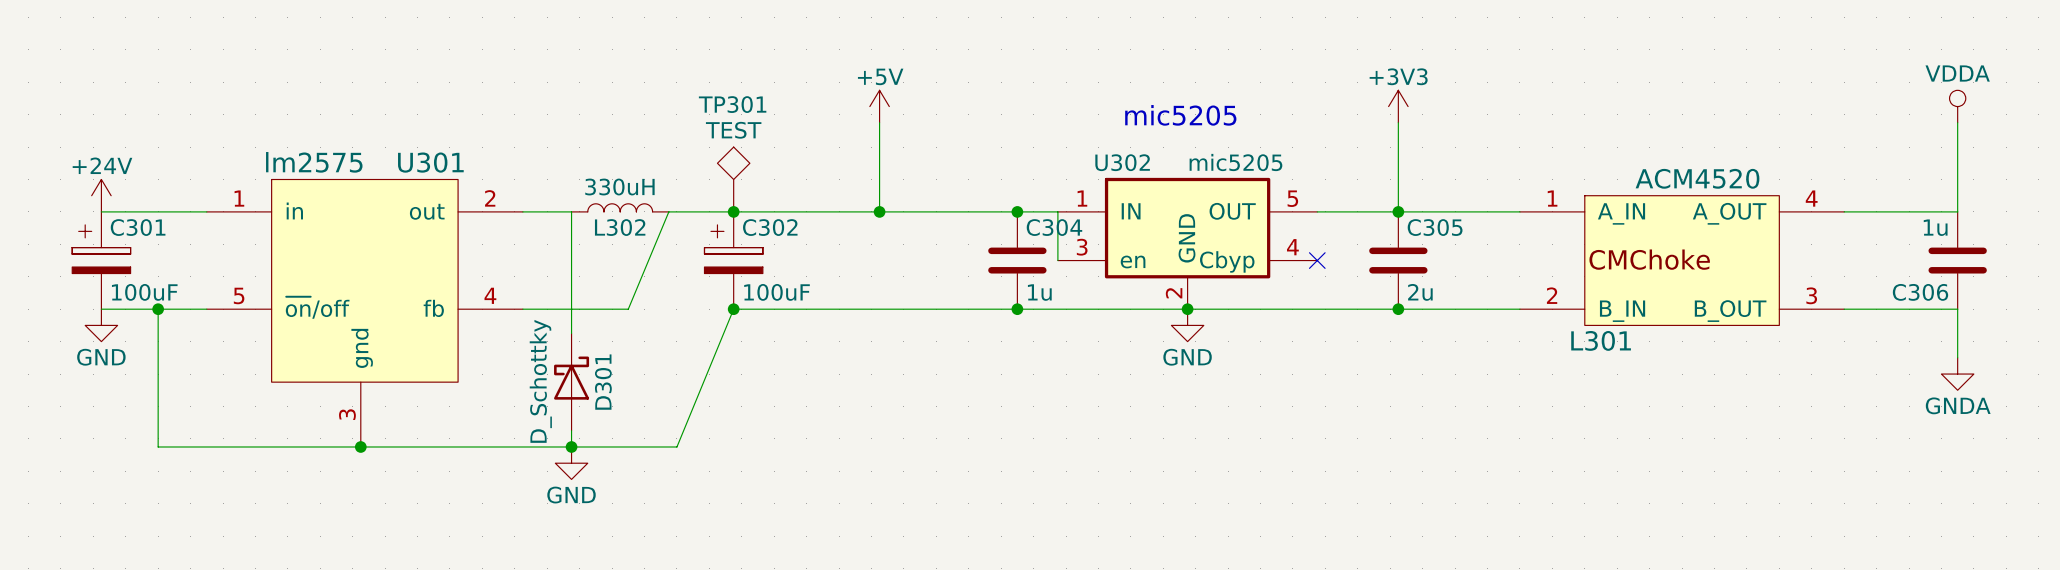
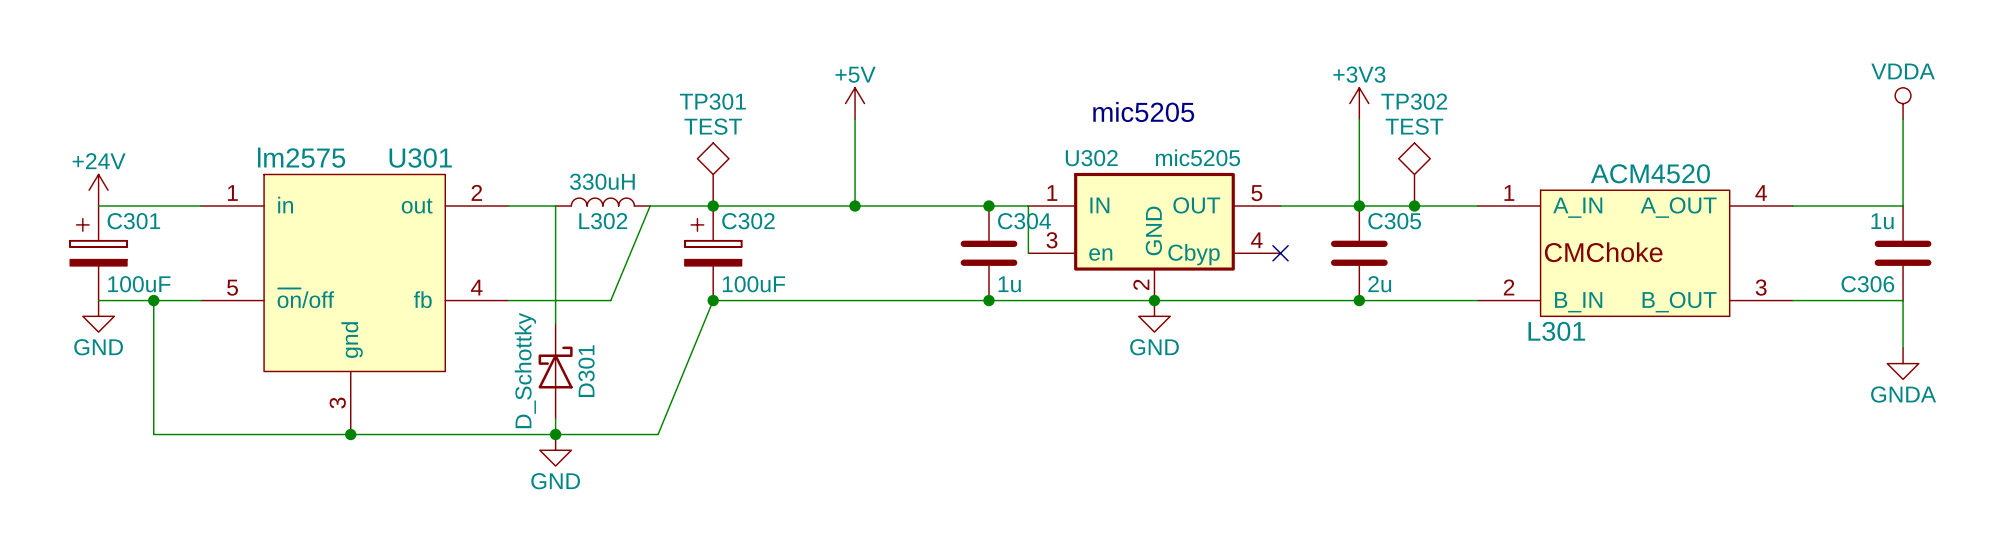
TP302: none -> TEST (1414, 174)
junction: none -> (1414, 206)

